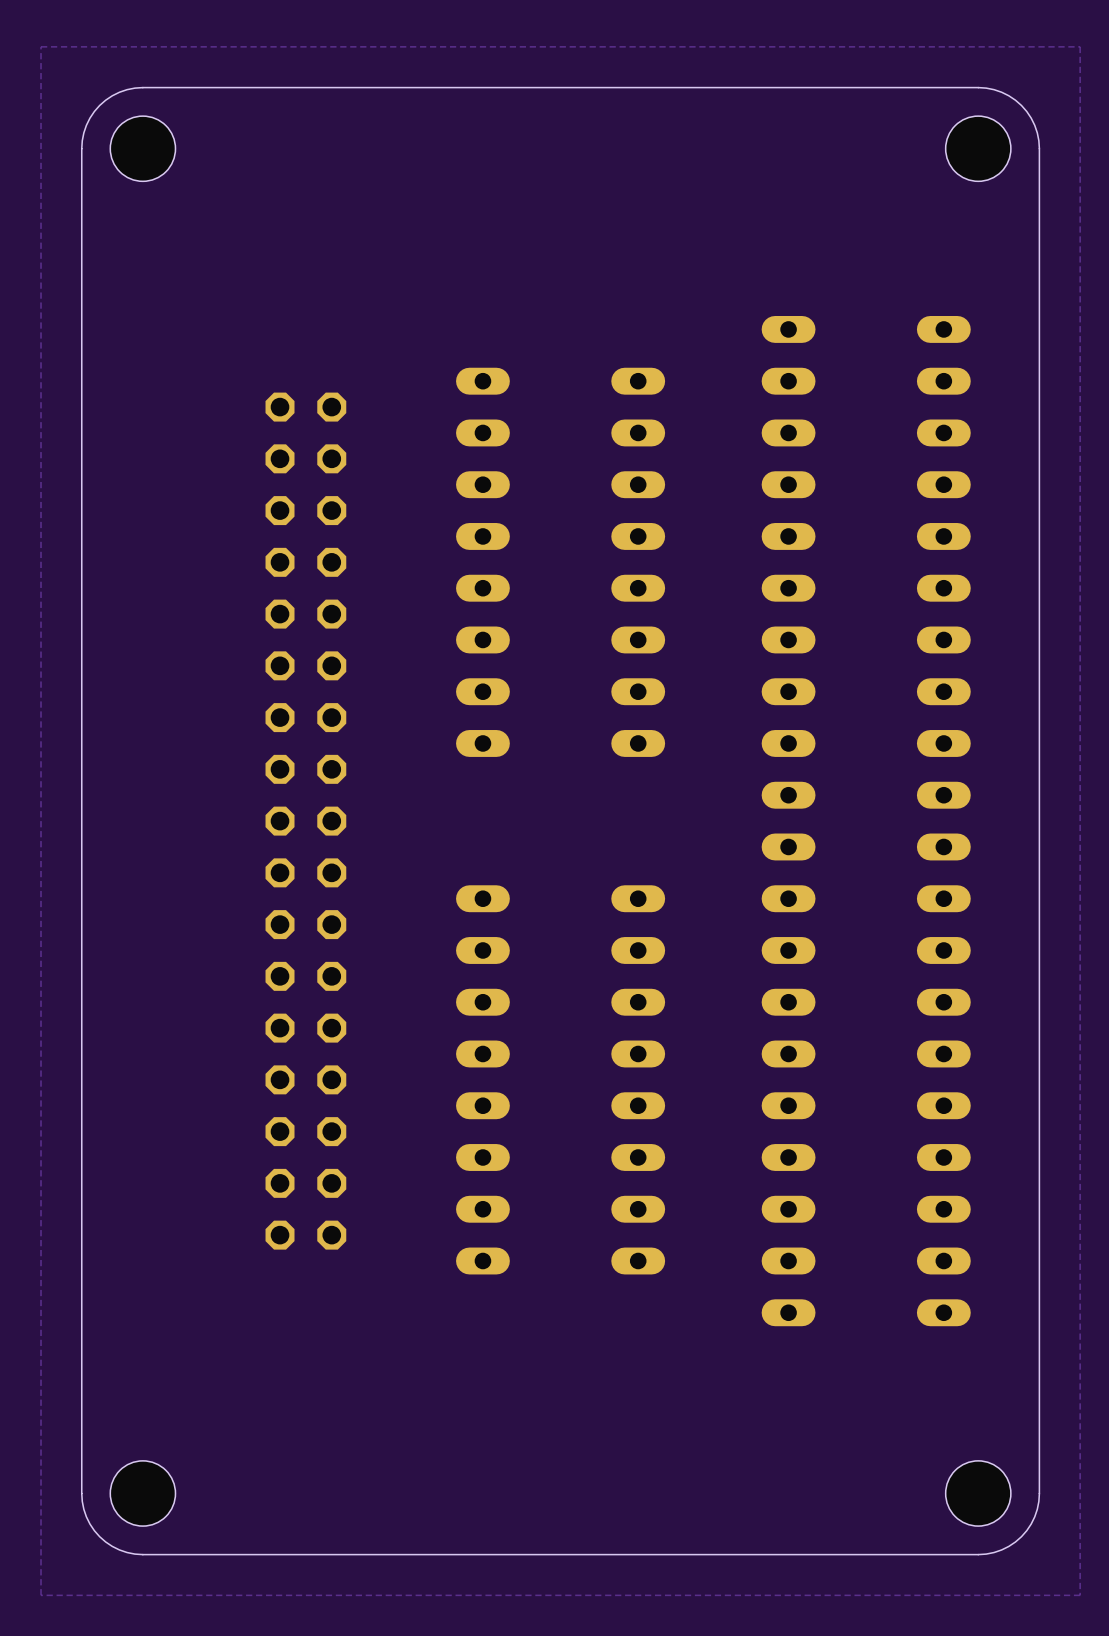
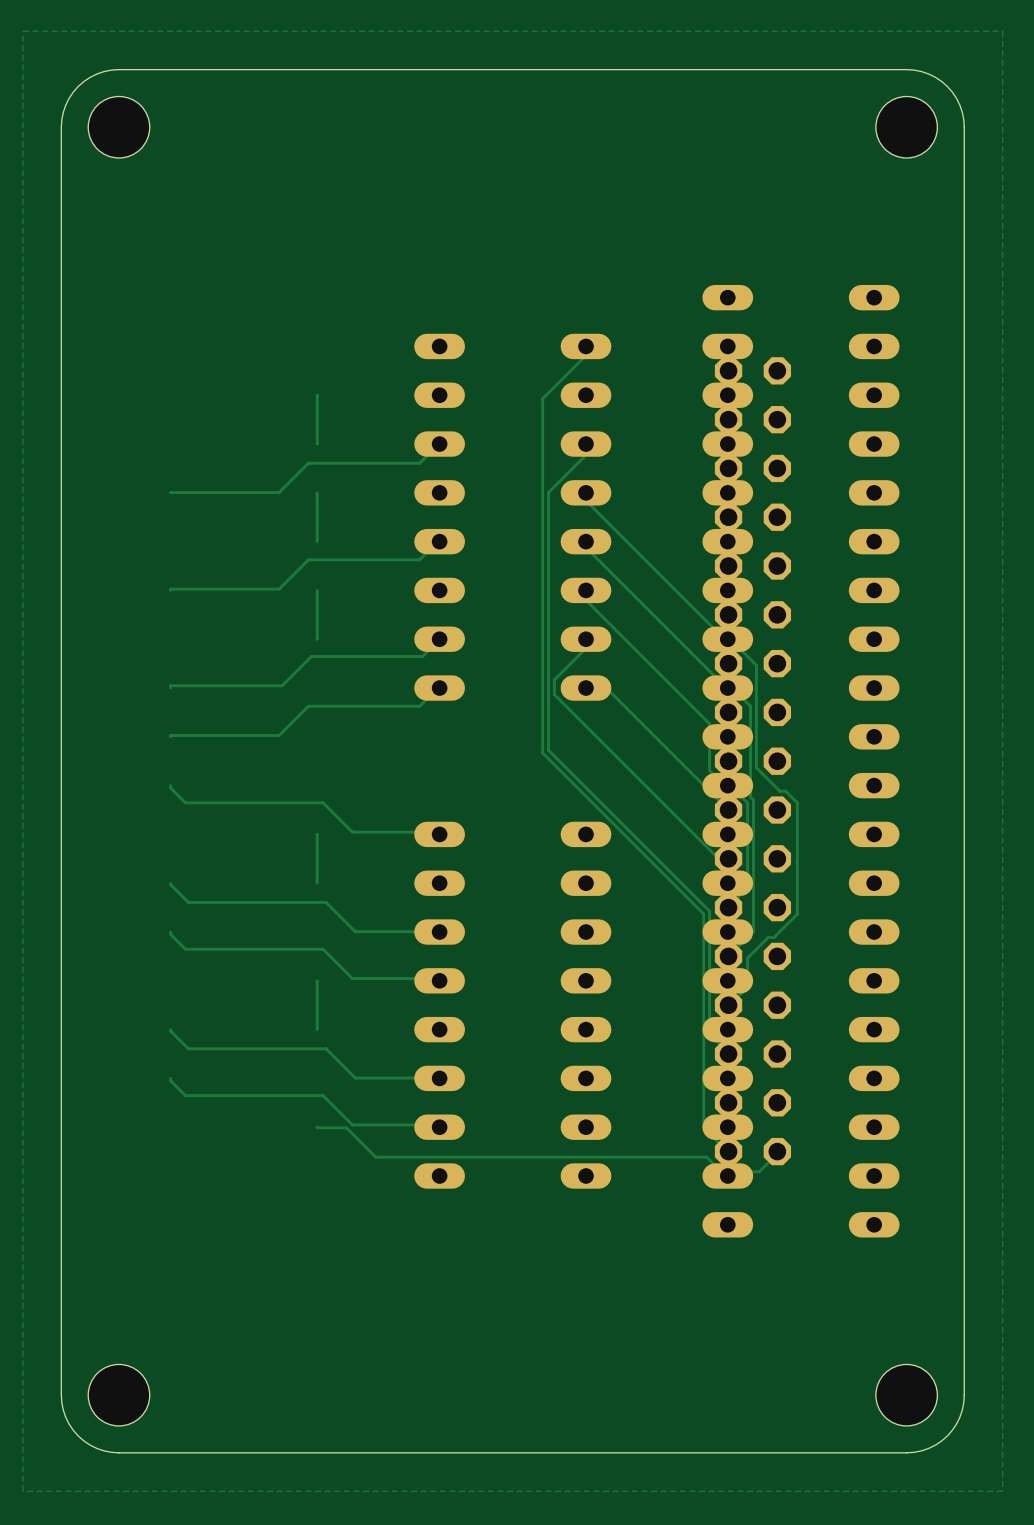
track: none -> (586, 346) (583, 349) (583, 357) (542, 398) (542, 753) (703, 914) (703, 1127) (728, 1151)
track: none -> (317, 395) (317, 444)
track: none -> (439, 444) (419, 463) (308, 463) (279, 492) (170, 492)
track: none -> (586, 444) (583, 445) (583, 457) (548, 492) (548, 750) (709, 911) (709, 1034) (728, 1054)
track: none -> (317, 492) (317, 541)
track: none -> (586, 492) (586, 501) (730, 644) (735, 644) (756, 665) (756, 767) (779, 791) (785, 791) (797, 802) (797, 914) (773, 937) (768, 937) (747, 958) (747, 987) (728, 1005)
track: none -> (439, 541) (419, 559) (308, 559) (279, 589) (170, 590)
track: none -> (586, 541) (586, 548) (730, 691) (735, 691) (750, 706) (750, 797) (753, 799) (753, 931) (728, 956)
track: none -> (317, 590) (317, 638)
track: none -> (586, 590) (586, 600) (709, 723) (709, 770) (730, 791) (735, 791) (747, 802) (747, 887) (728, 907)
track: none -> (439, 639) (422, 656) (311, 656) (282, 685) (170, 685) (170, 688)
track: none -> (586, 639) (583, 641) (583, 650) (554, 679) (554, 694) (718, 858) (728, 858)
track: none -> (439, 688) (419, 706) (308, 706) (279, 735) (170, 736)
track: none -> (586, 688) (607, 688) (728, 810)
part position: (305, 821) -> (752, 761)
track: none -> (170, 785) (170, 788) (185, 802) (323, 802) (352, 832) (437, 832) (439, 834)
track: none -> (317, 834) (317, 883)
track: none -> (170, 883) (188, 902) (326, 902) (355, 931) (439, 932)
track: none -> (170, 932) (170, 934) (185, 949) (323, 949) (352, 978) (437, 978) (439, 980)
track: none -> (317, 980) (317, 1029)
track: none -> (170, 1029) (188, 1048) (326, 1048) (355, 1078) (439, 1078)
track: none -> (170, 1078) (170, 1081) (185, 1095) (323, 1095) (352, 1124) (437, 1124) (439, 1127)
track: none -> (317, 1127) (346, 1127) (375, 1157) (706, 1157) (721, 1171) (759, 1171) (777, 1151)

